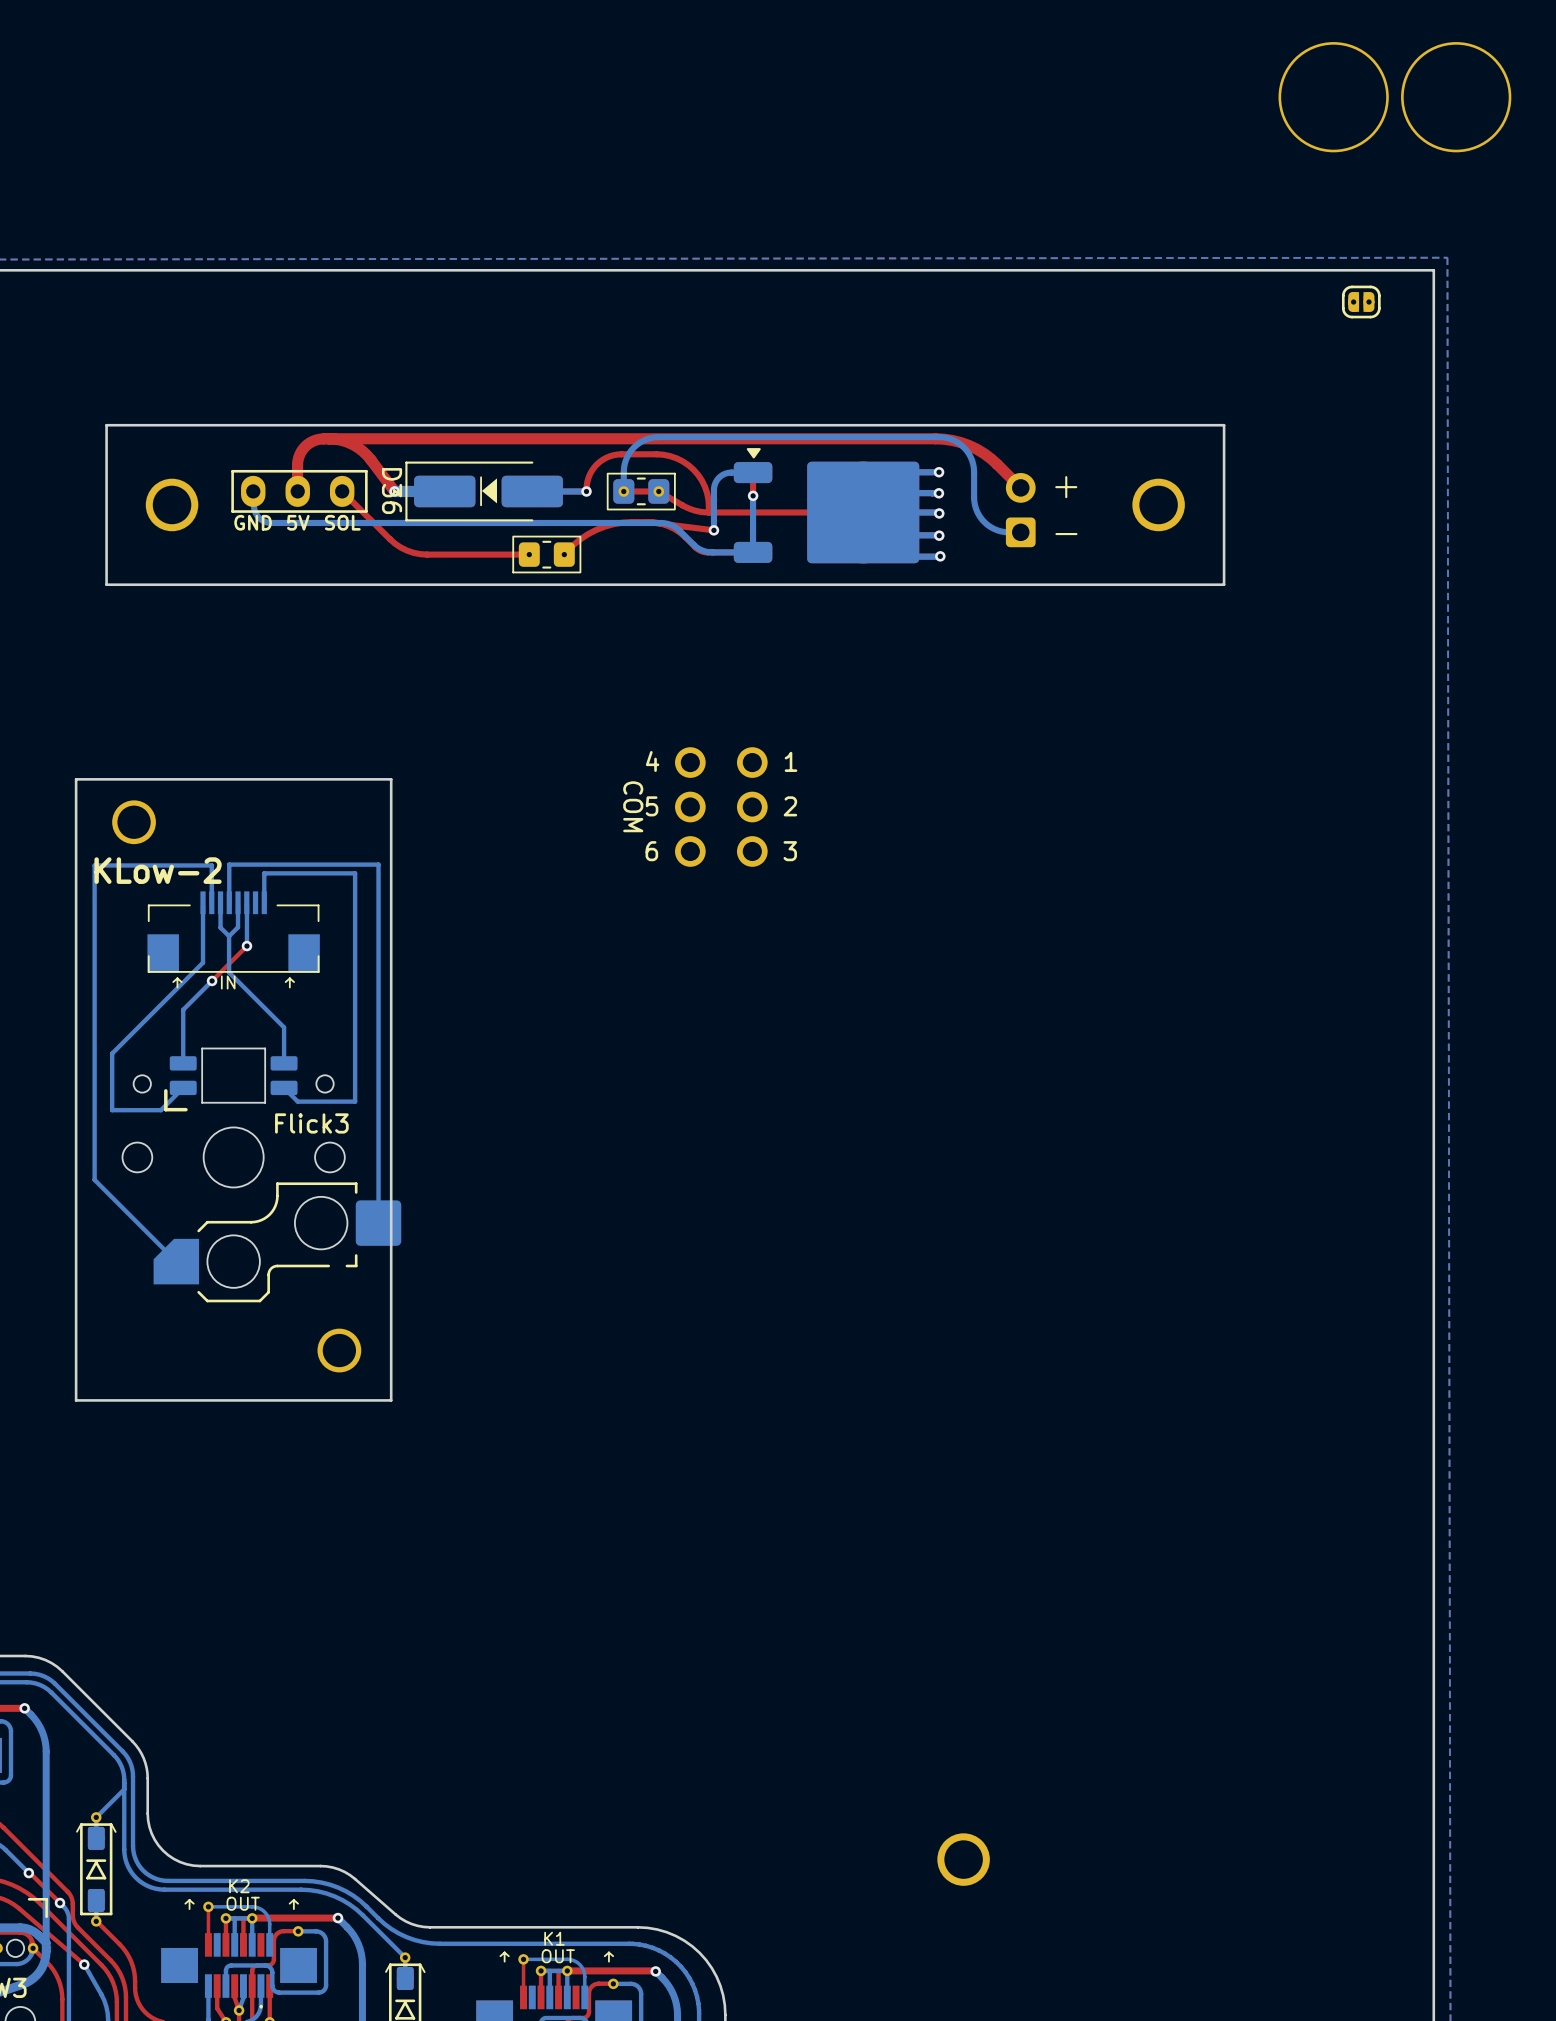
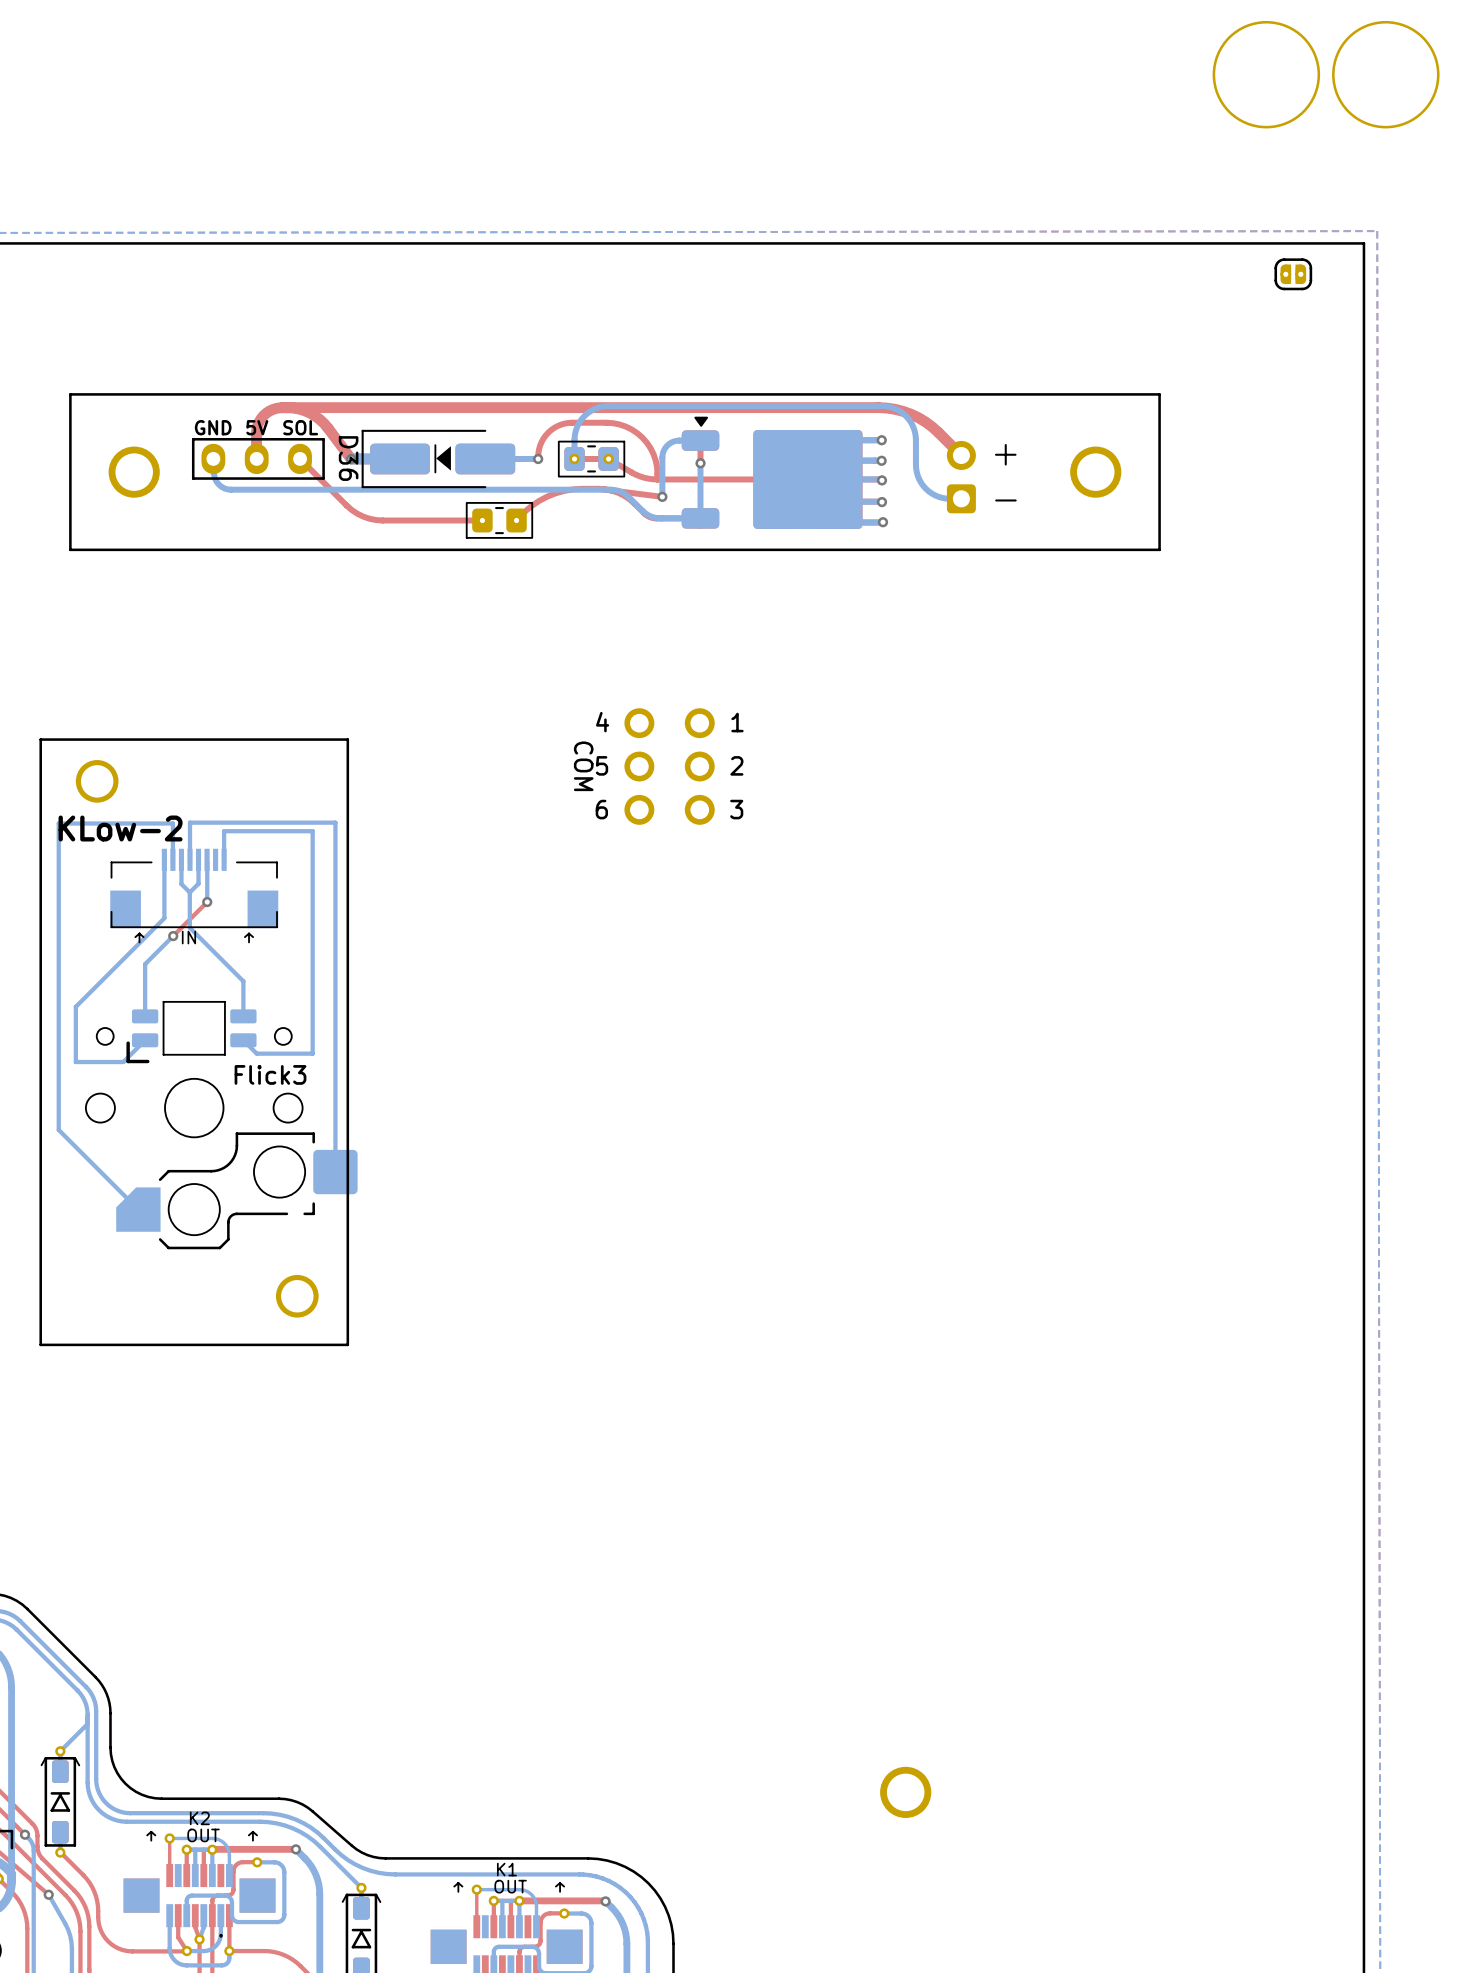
part text position: GND (253, 522) -> GND (213, 427)
part text position: 5V (298, 522) -> 5V (257, 427)
part text position: SOL (342, 522) -> SOL (300, 427)

